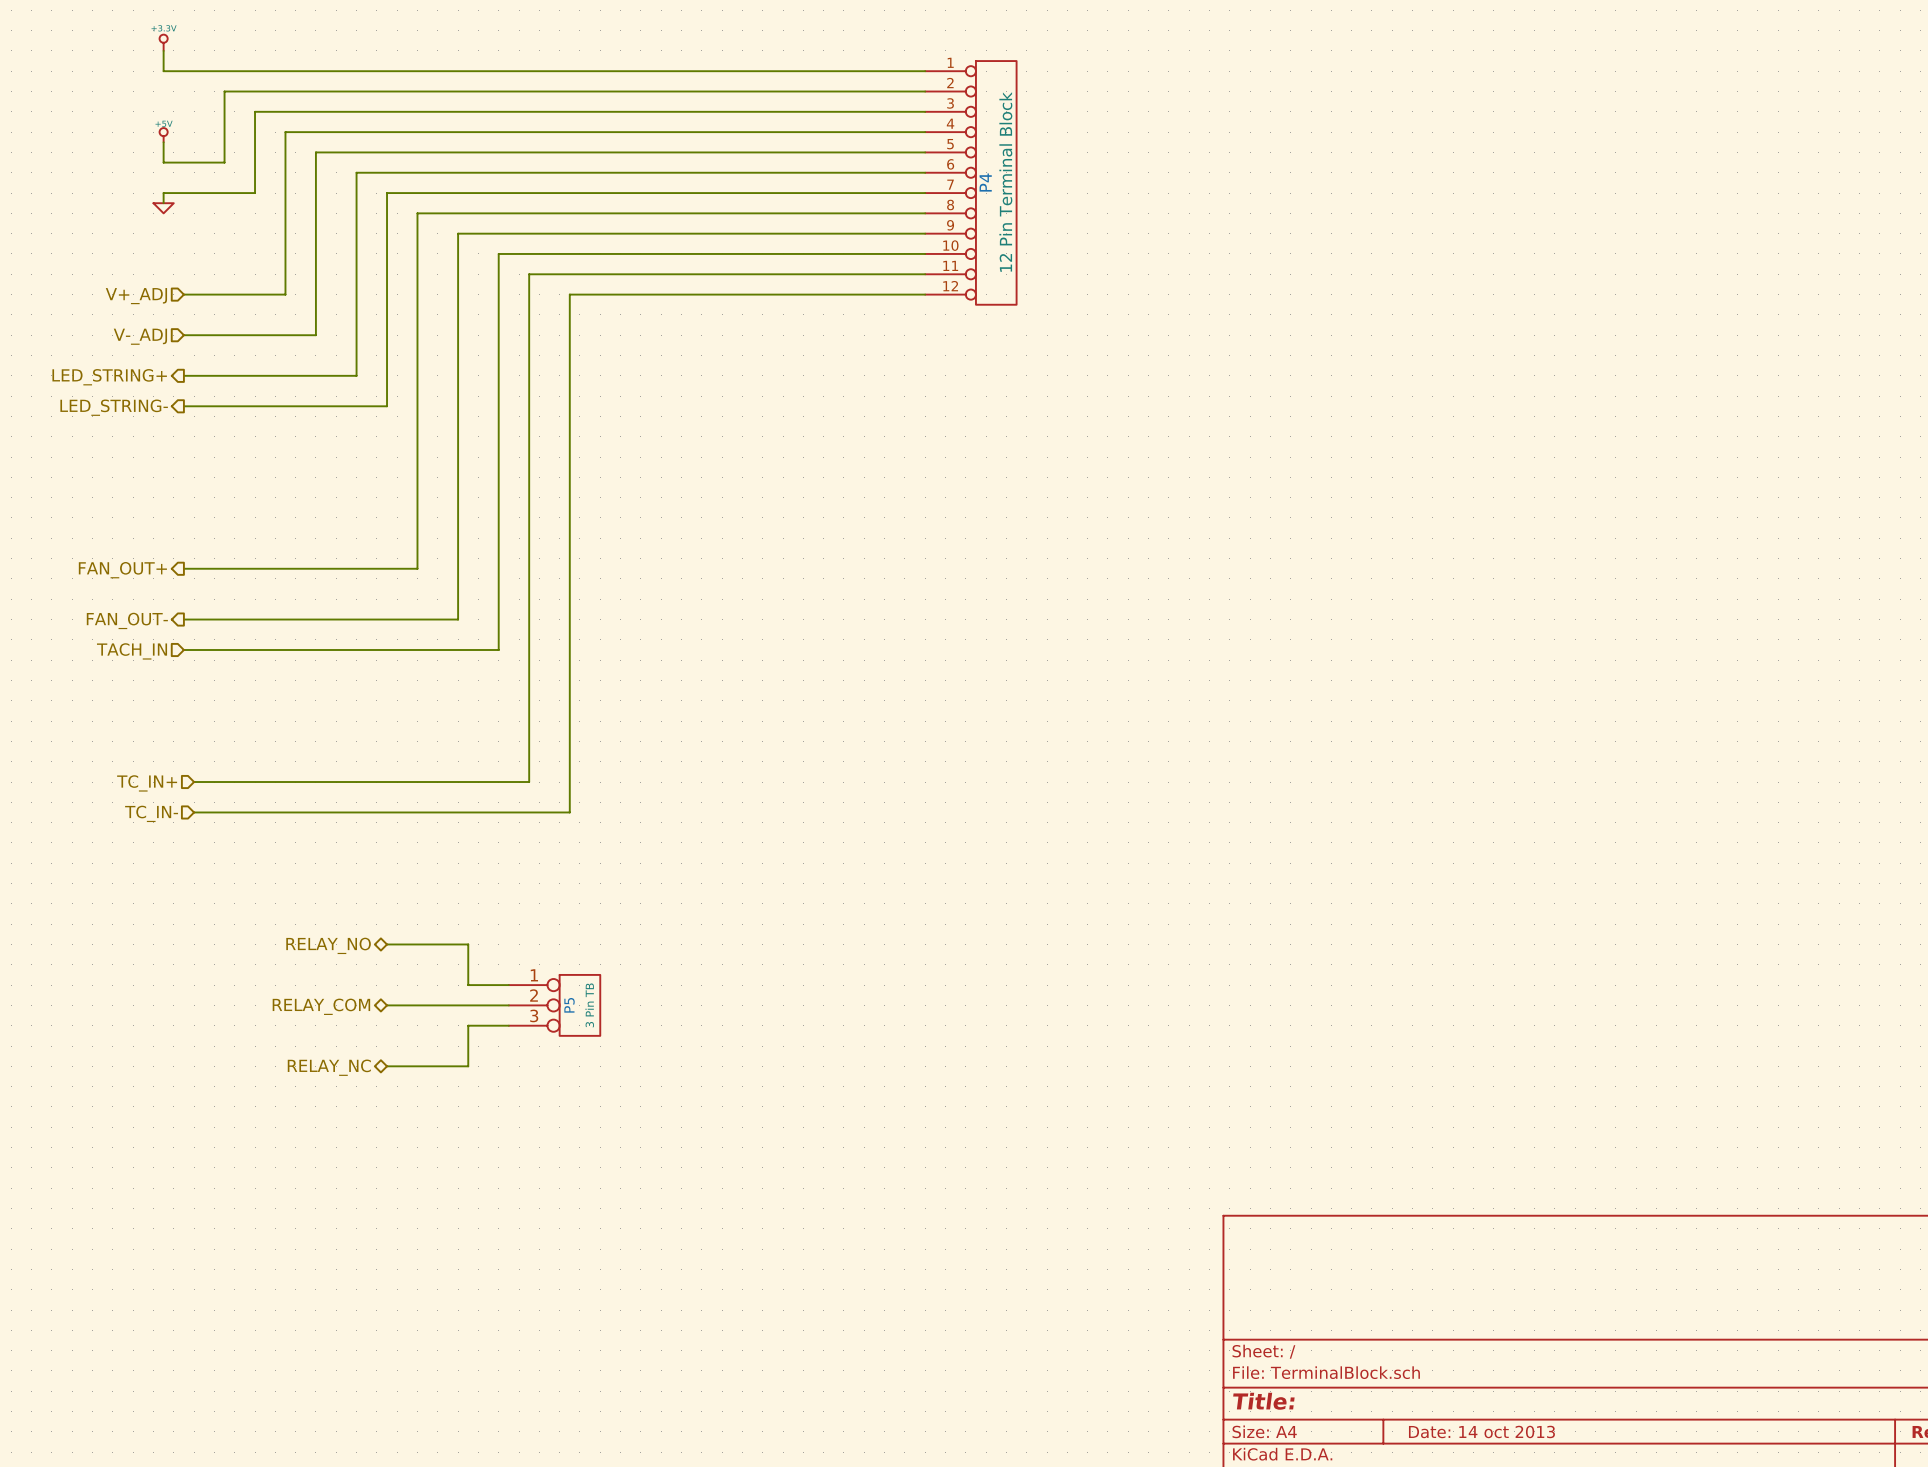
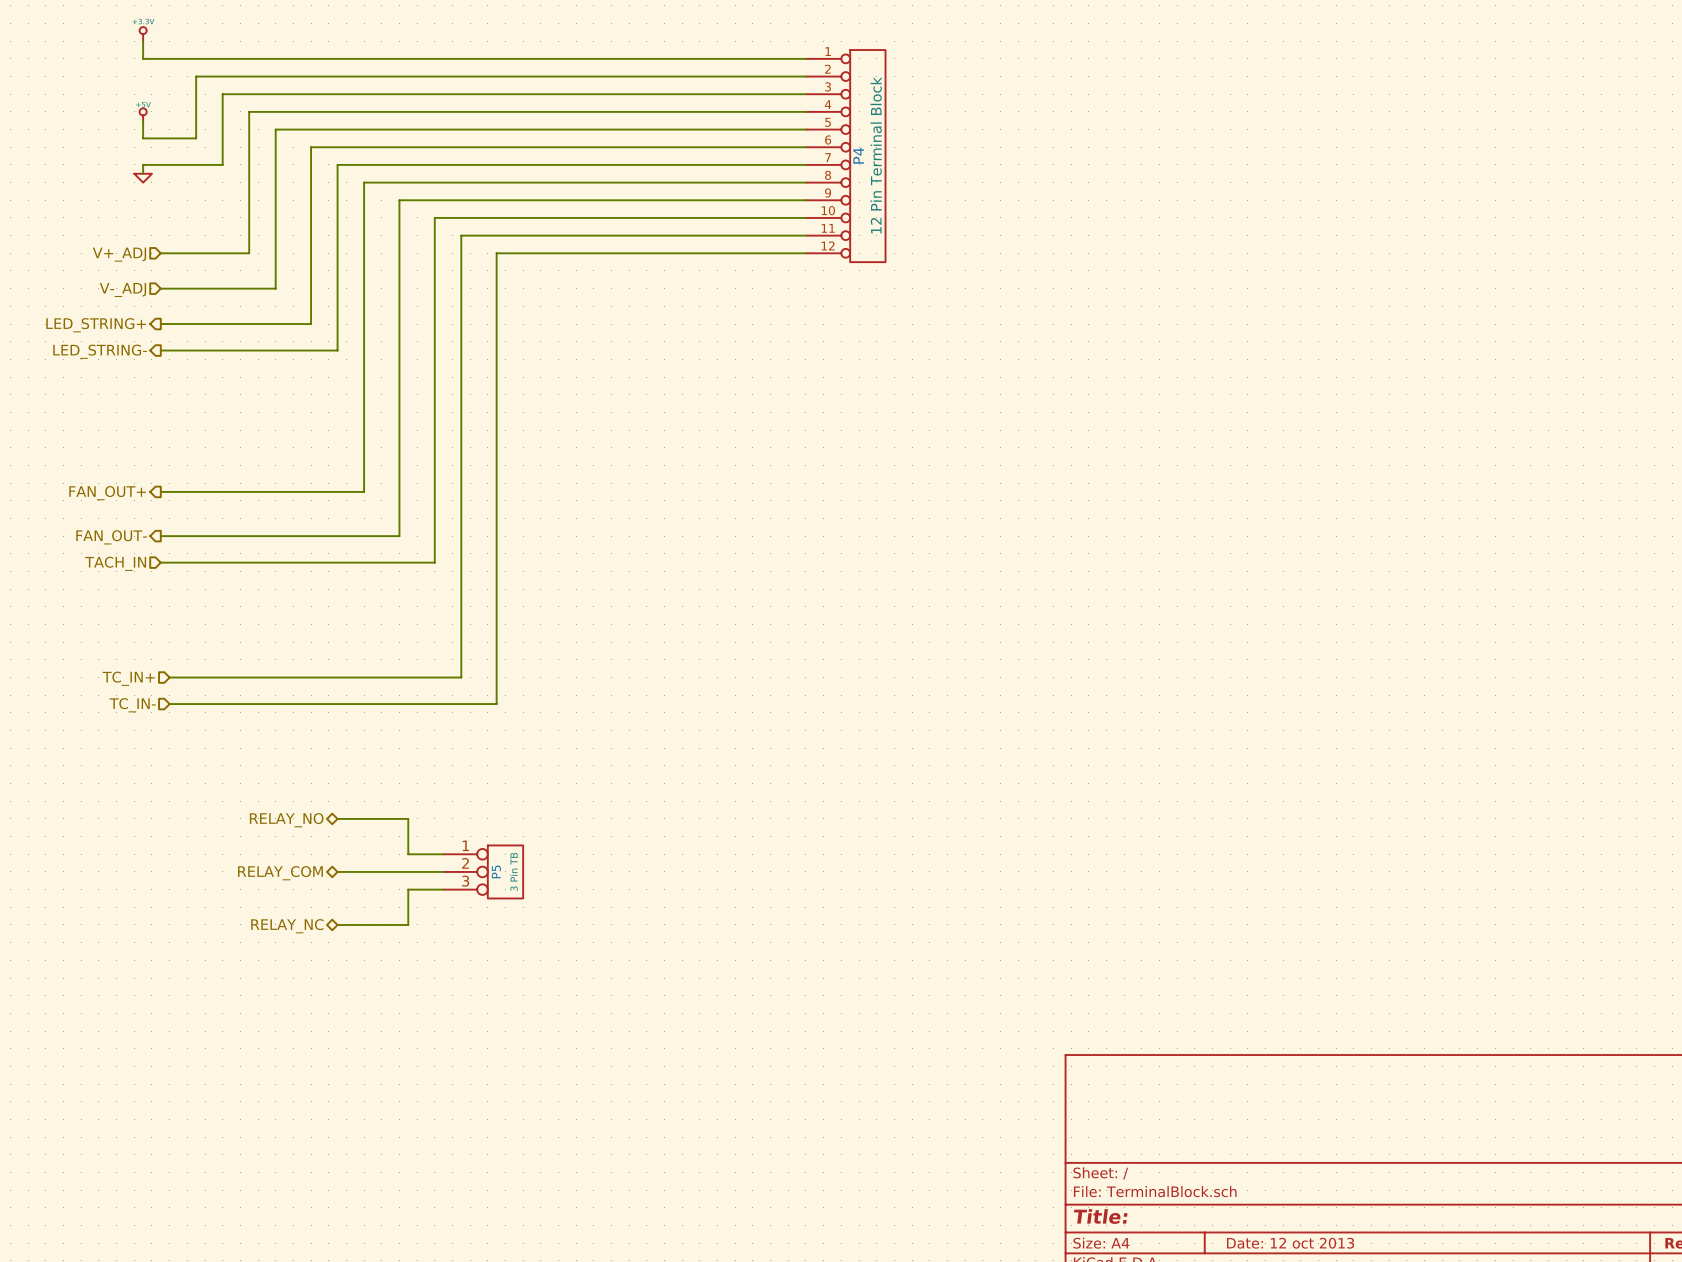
title block: Date: 14 oct 2013 (1481, 1431) -> Date: 12 oct 2013 (1290, 1243)

